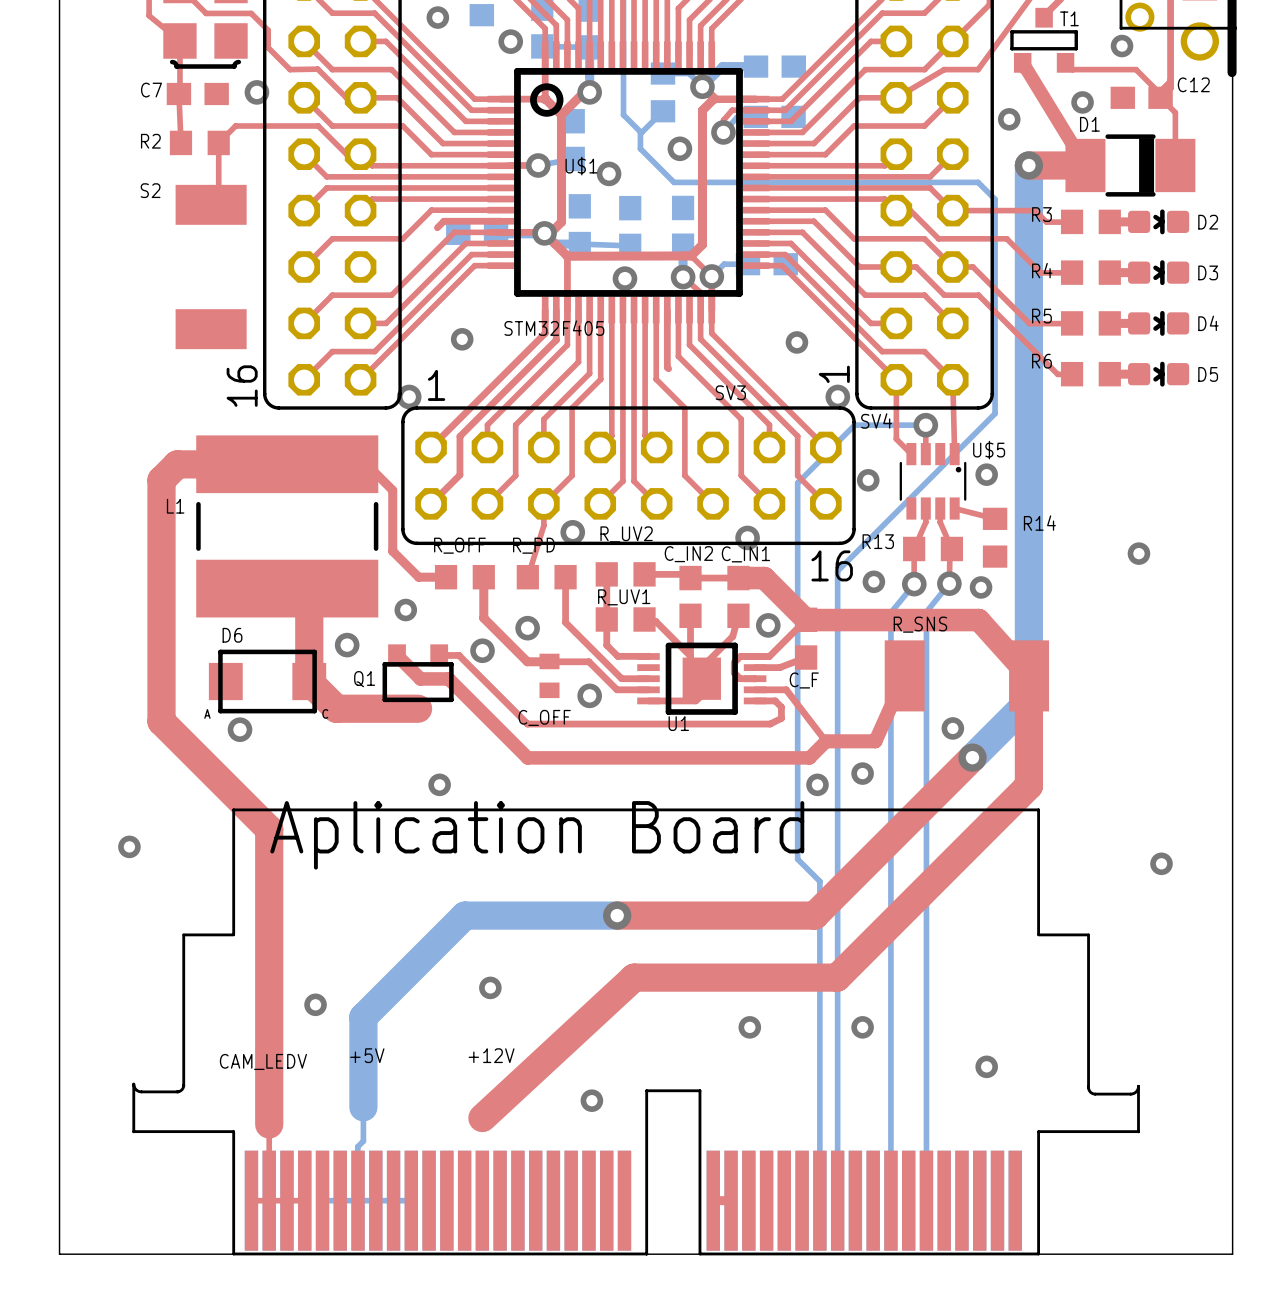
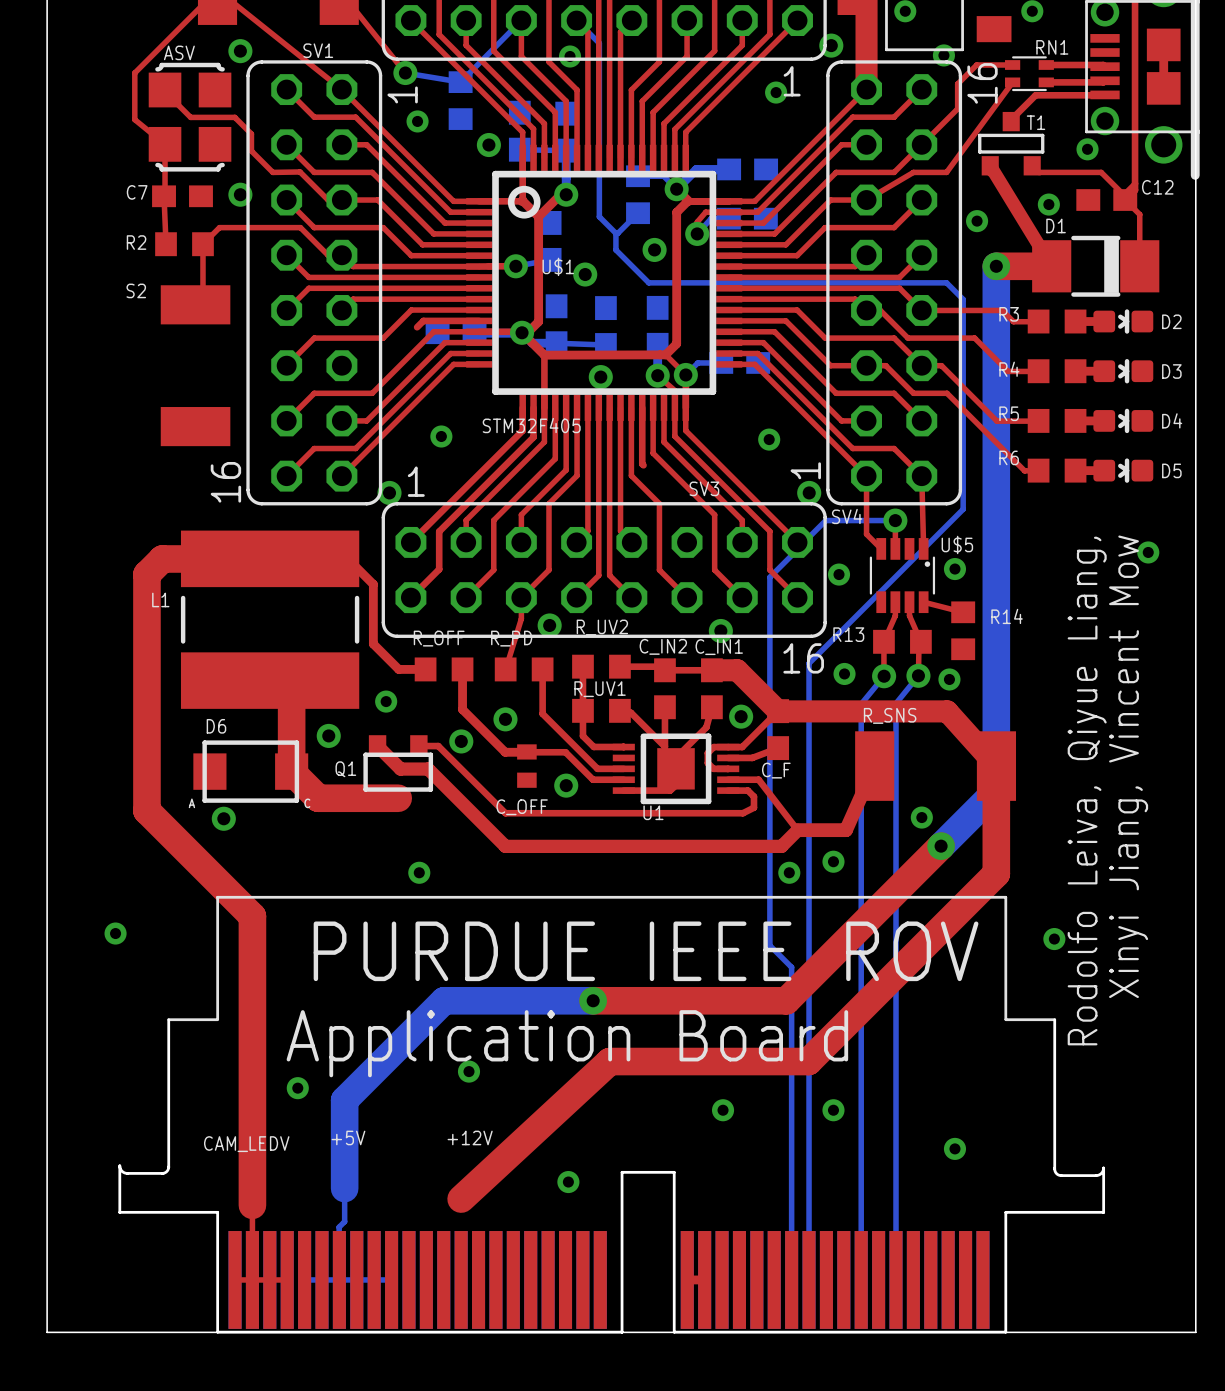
via position: (1138, 553) -> (1148, 552)
text: none -> Xinyi Jiang, Vincent Mow (1128, 766)
text: none -> Rodolfo Leiva, Qiyue Liang, (1087, 791)
text: Aplication Board (537, 835) -> none
via position: (1161, 863) -> (1054, 939)
text: none -> PURDUE IEEE ROV (646, 951)
text: none -> Application Board (567, 1043)

